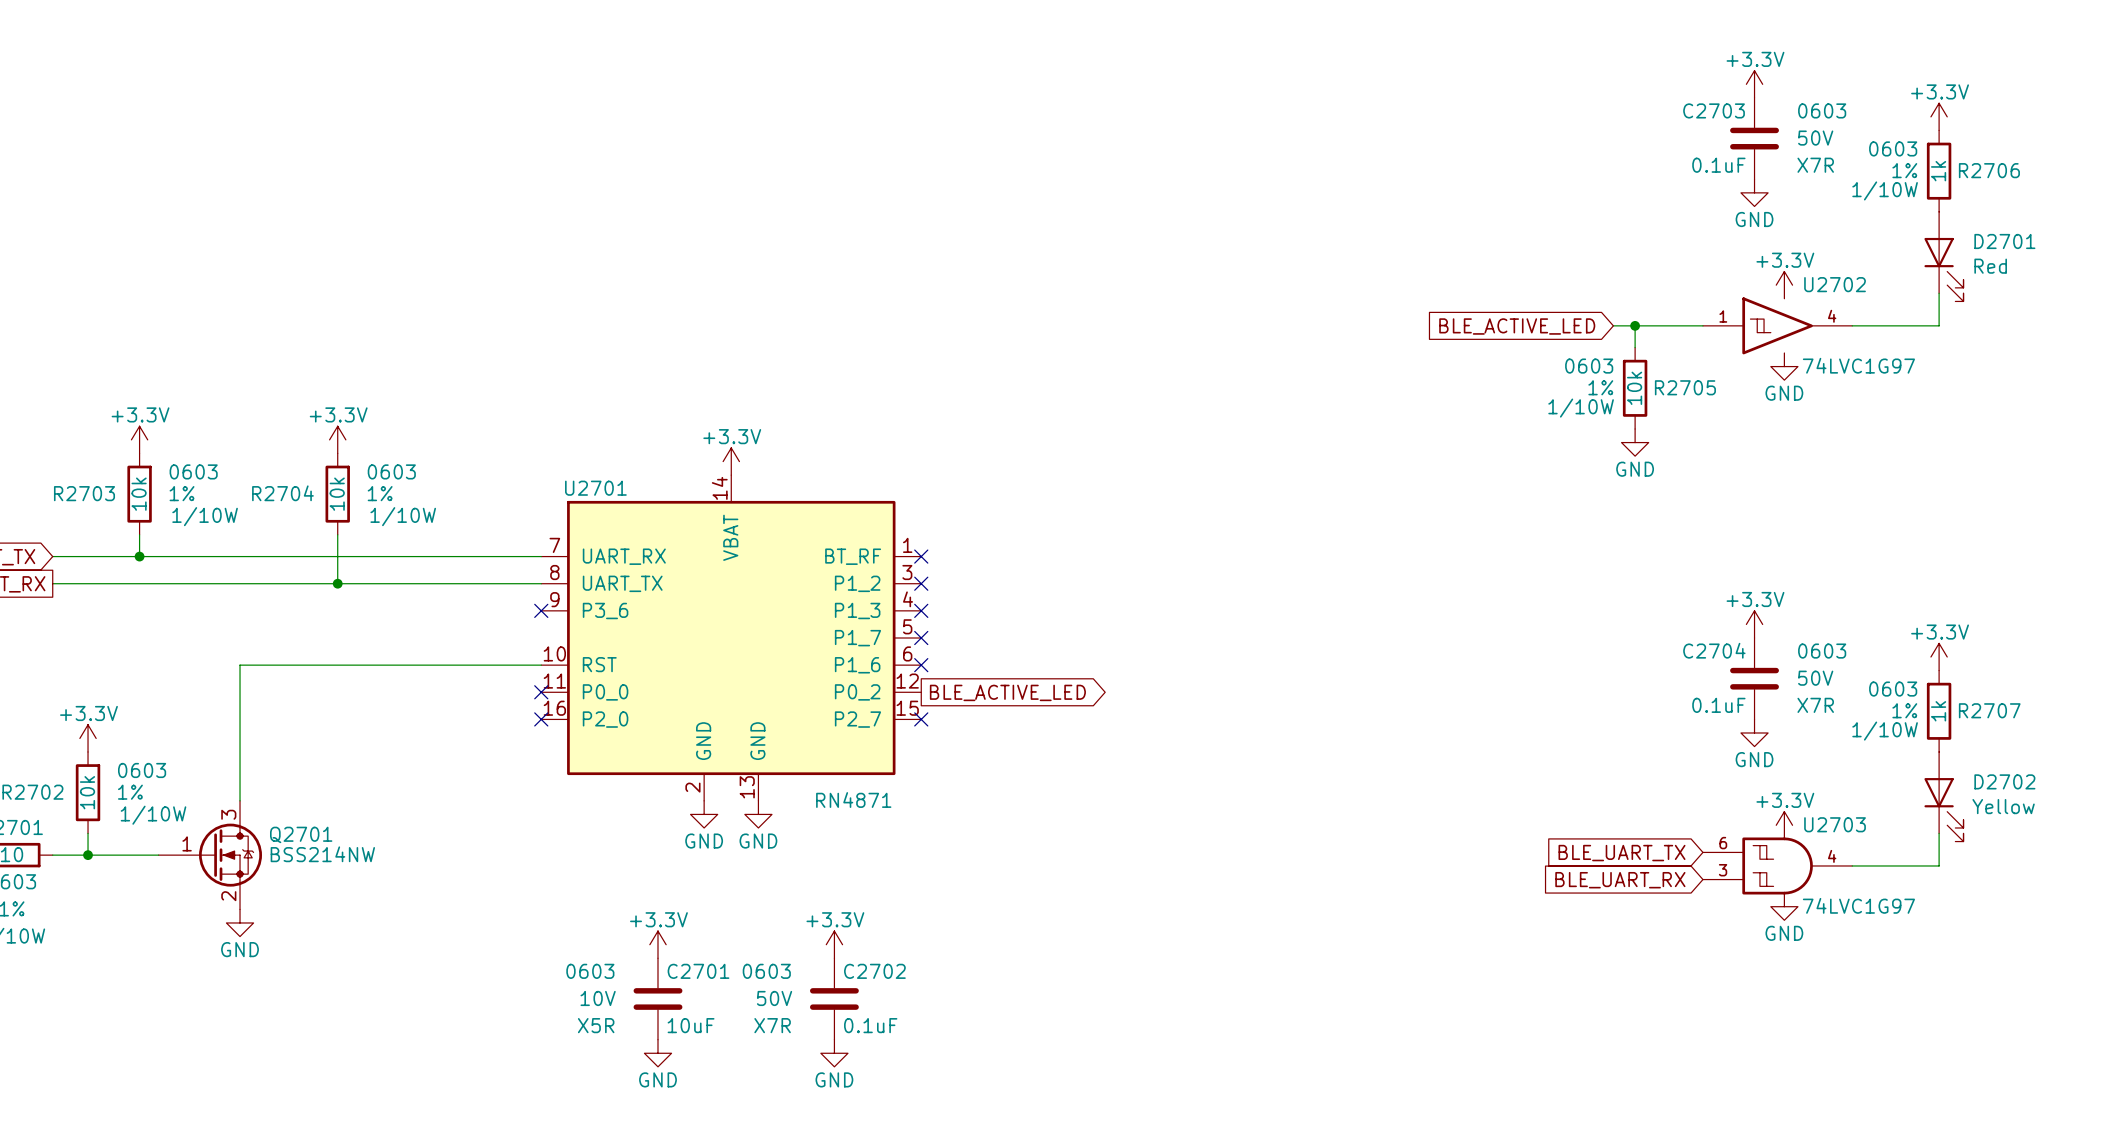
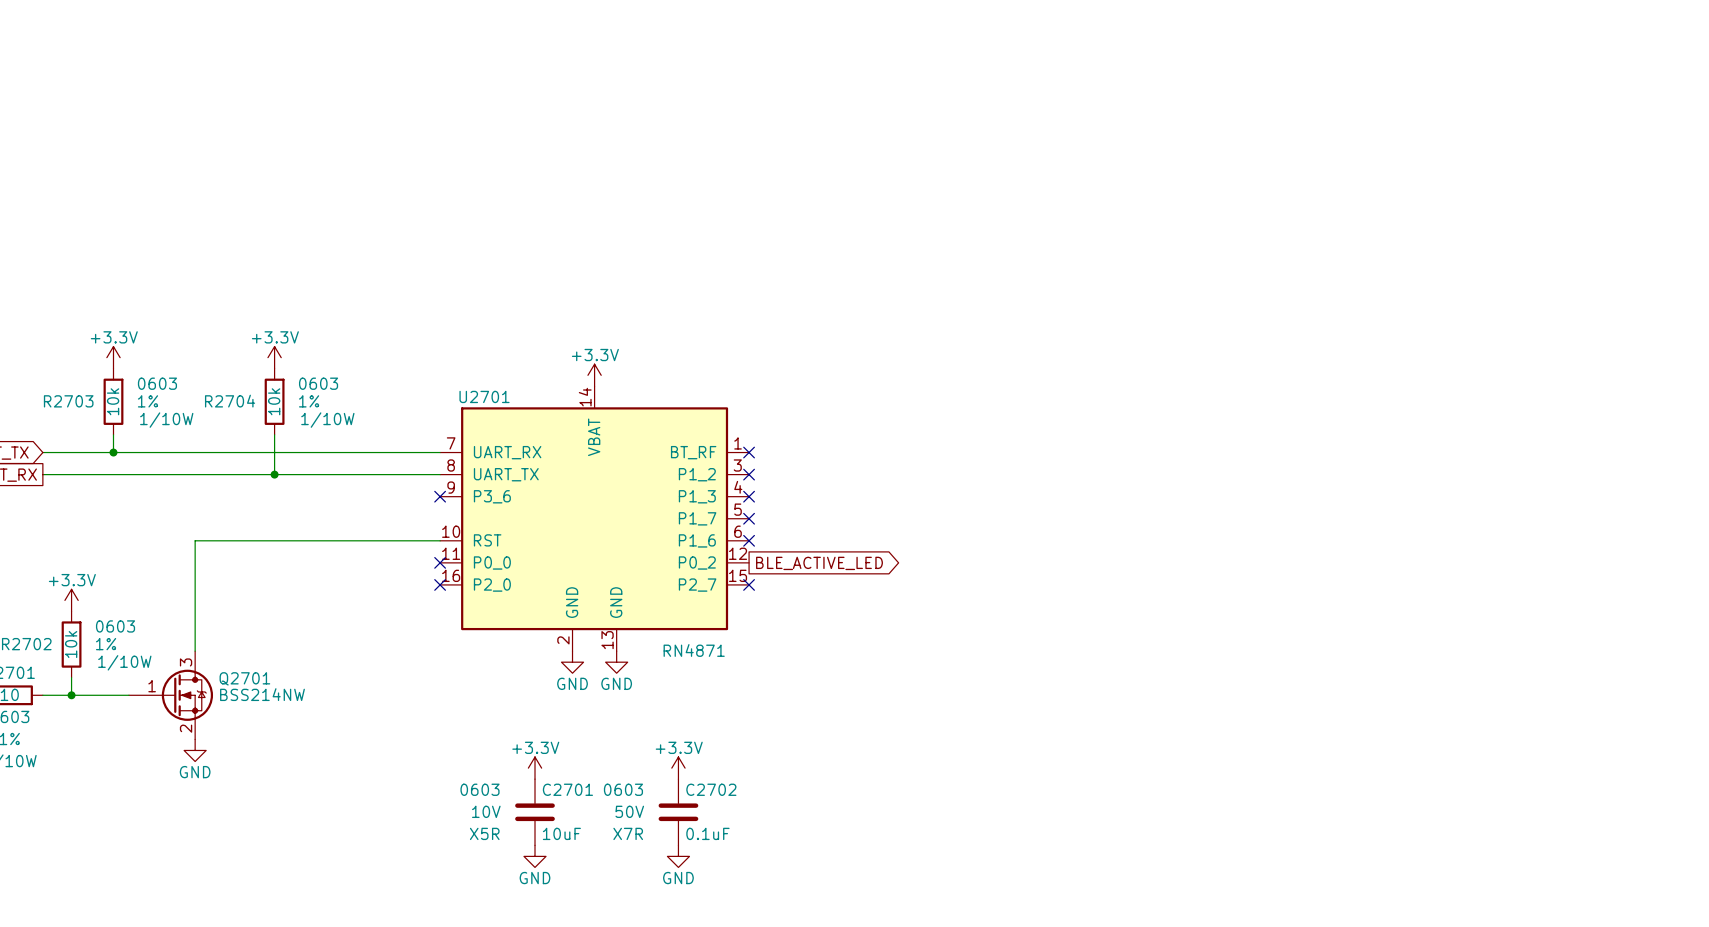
power symbol: +3.3V (1754, 84) -> none
power symbol: +3.3V (1939, 116) -> none
C2703: 0.1uF (1754, 138) -> none
R2706: 1k (1939, 171) -> none
power symbol: GND (1754, 192) -> none
D2701: Red (1943, 256) -> none
power symbol: +3.3V (1784, 285) -> none
wire: (1939, 293) (1939, 325) (1852, 325) -> none
wire: (1613, 325) (1702, 325) -> none
wire: (1635, 325) (1635, 347) -> none
junction: (1635, 325) -> none
U2702: 74LVC1G97 (1777, 325) -> none
global label: BLE_ACTIVE_LED (1517, 326) -> none
power symbol: GND (1784, 366) -> none
R2705: 10k (1635, 388) -> none
power symbol: GND (1635, 442) -> none
power symbol: +3.3V (1754, 624) -> none
power symbol: +3.3V (1939, 656) -> none
C2704: 0.1uF (1754, 678) -> none
R2707: 1k (1939, 711) -> none
power symbol: GND (1754, 732) -> none
D2702: Yellow (1943, 796) -> none
power symbol: +3.3V (1784, 825) -> none
wire: (1939, 833) (1939, 865) (1852, 865) -> none
global label: BLE_UART_TX (1621, 853) -> none
U2703: 74LVC1G97 (1777, 865) -> none
global label: BLE_UART_RX (1620, 880) -> none
power symbol: GND (1784, 906) -> none

